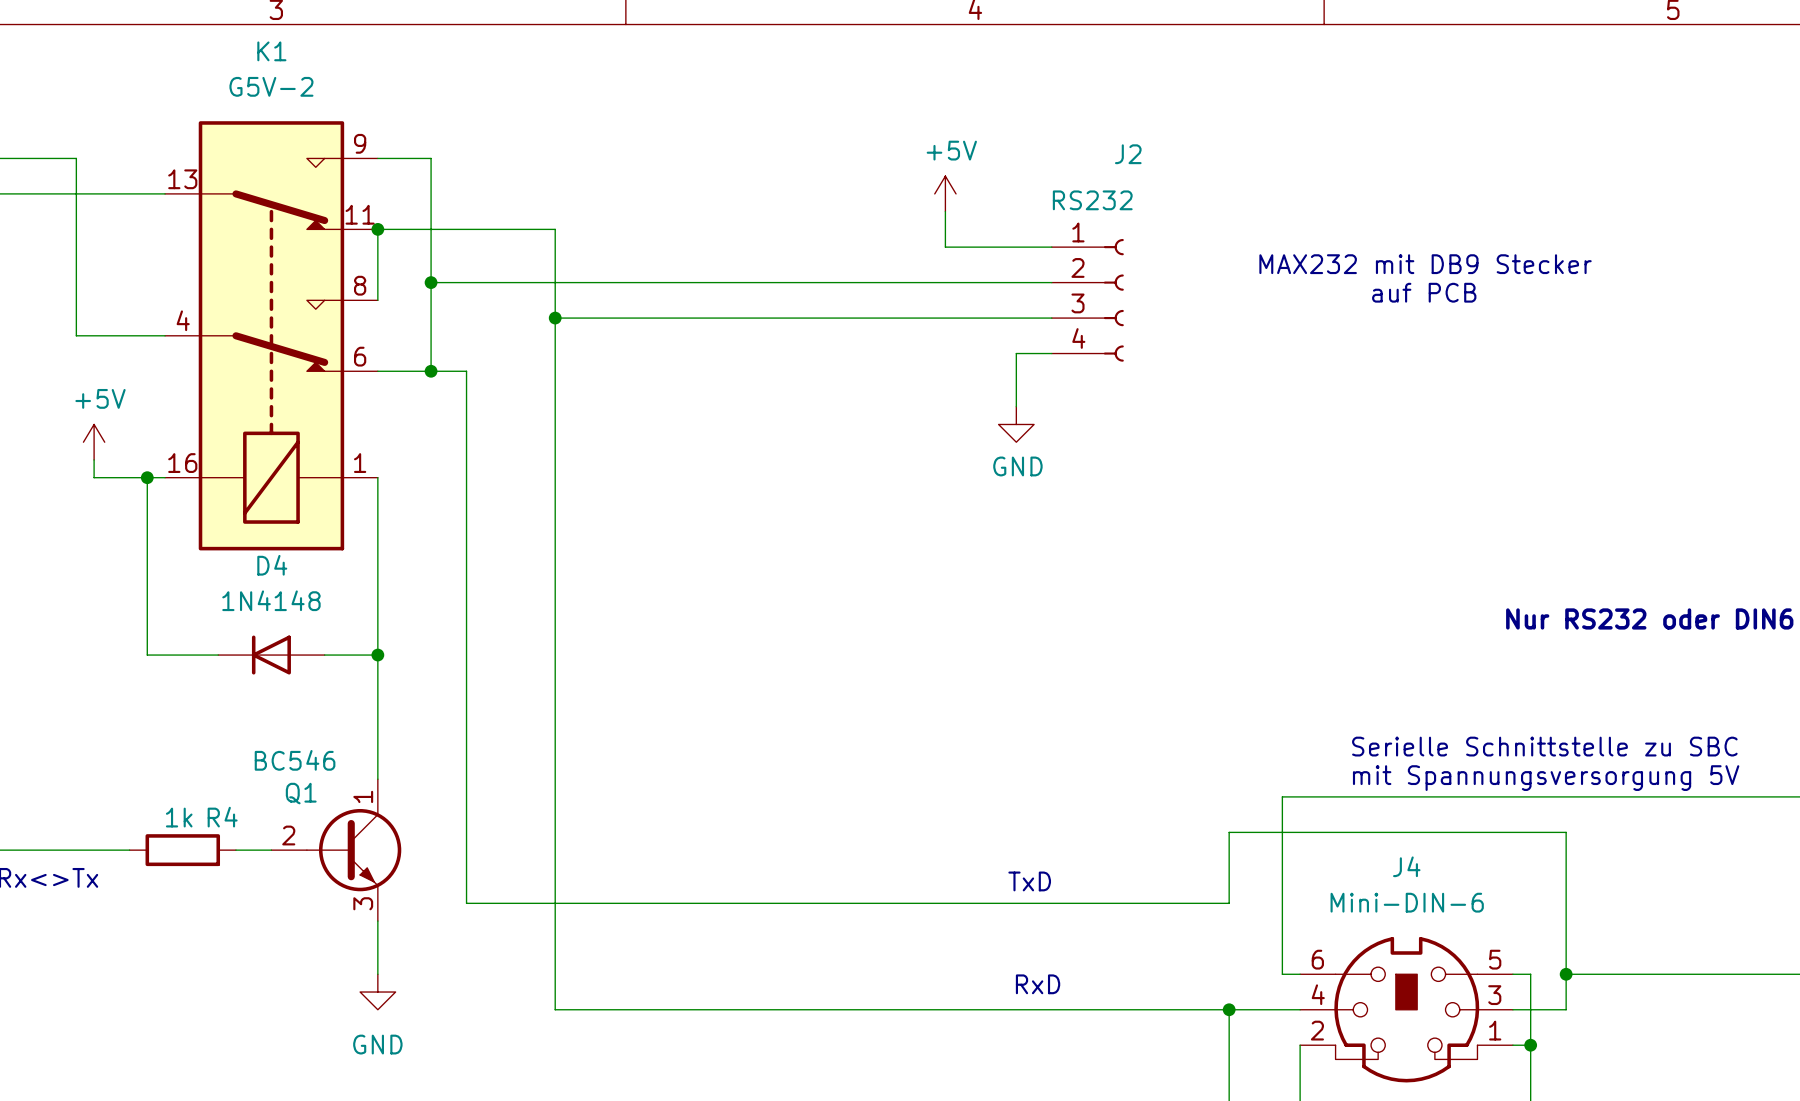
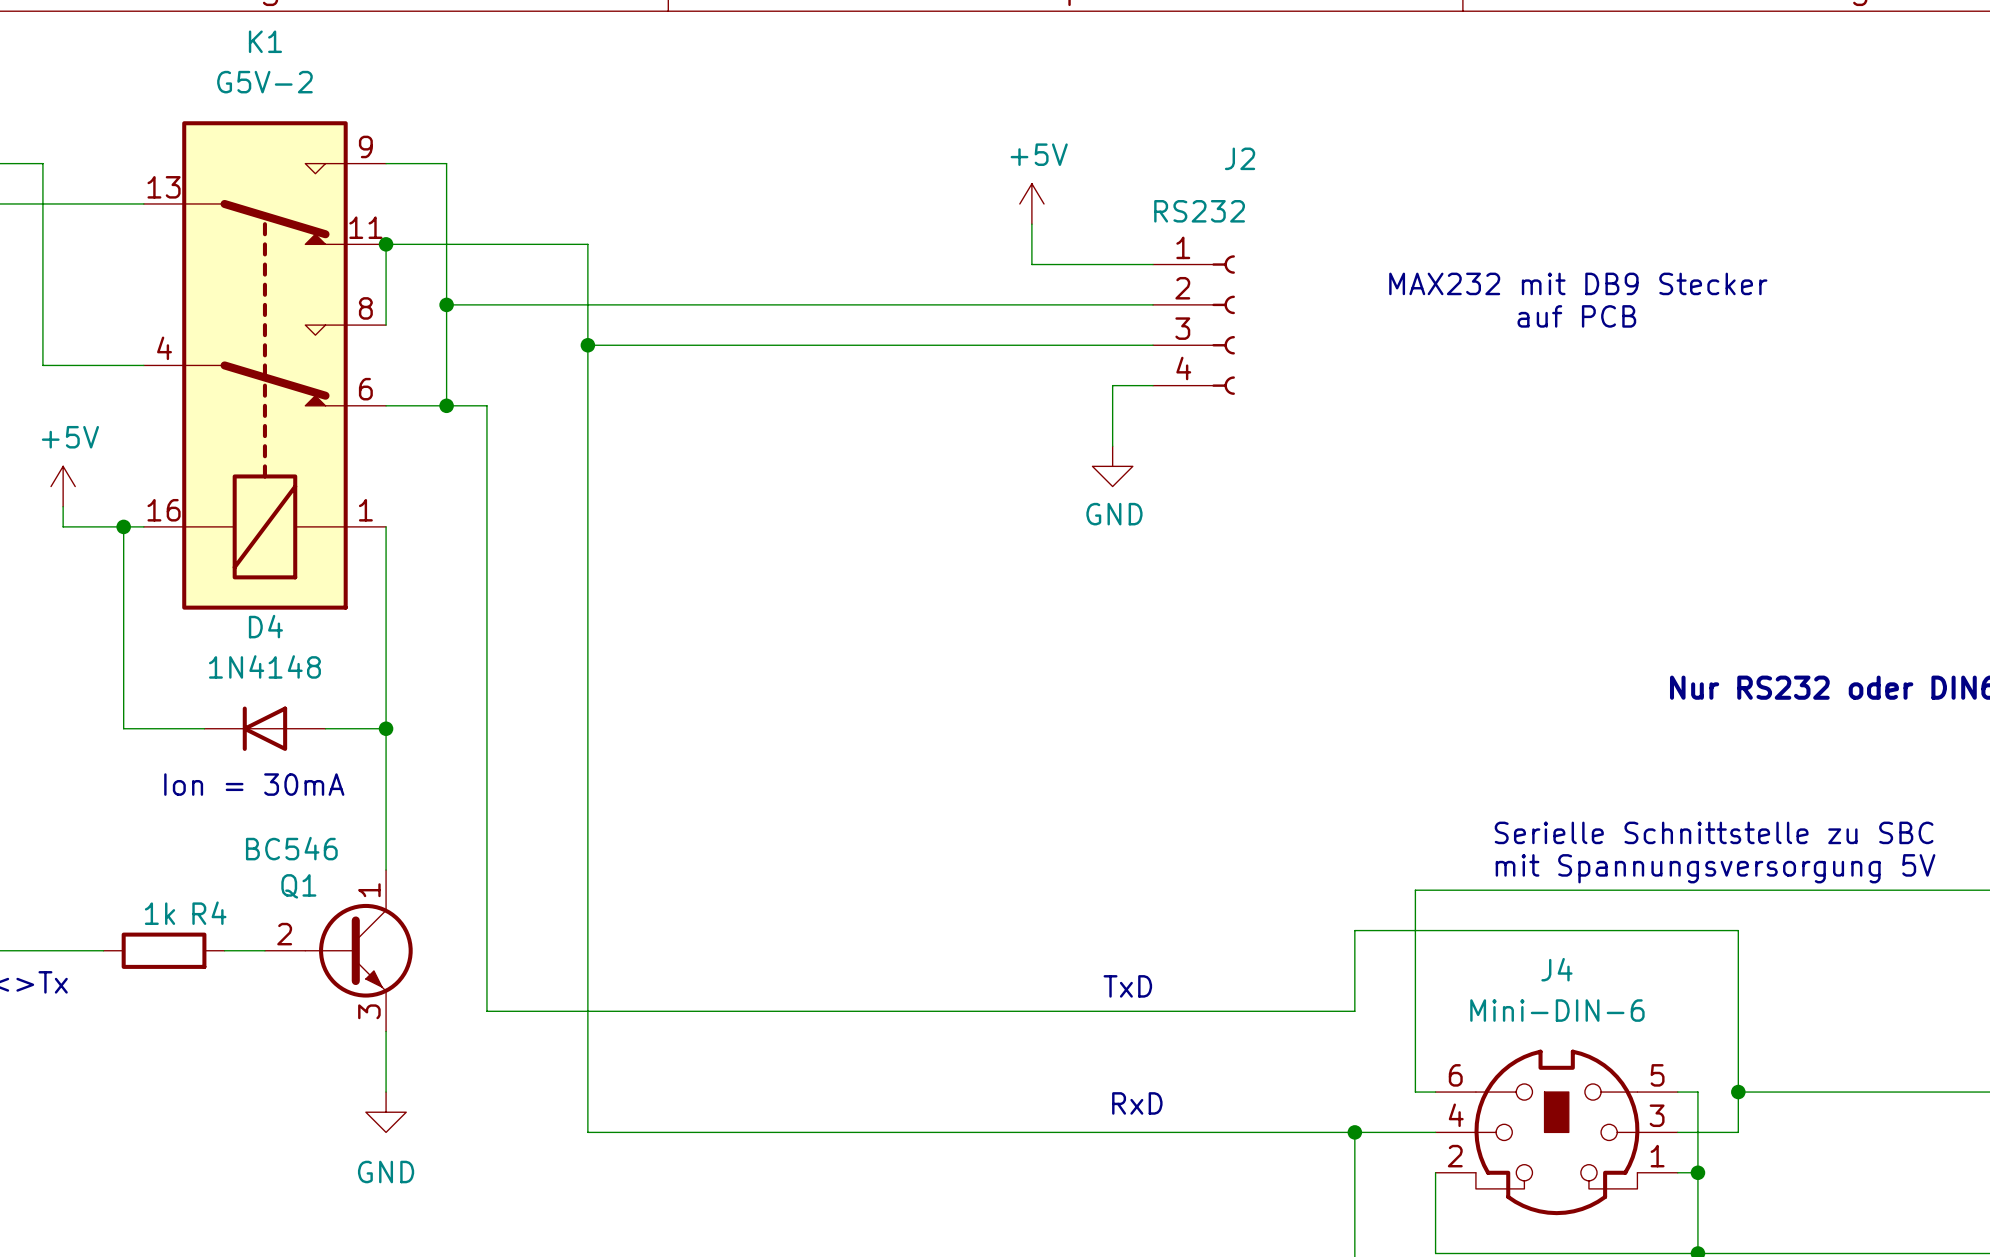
text: none -> Ion = 30mA (254, 784)

